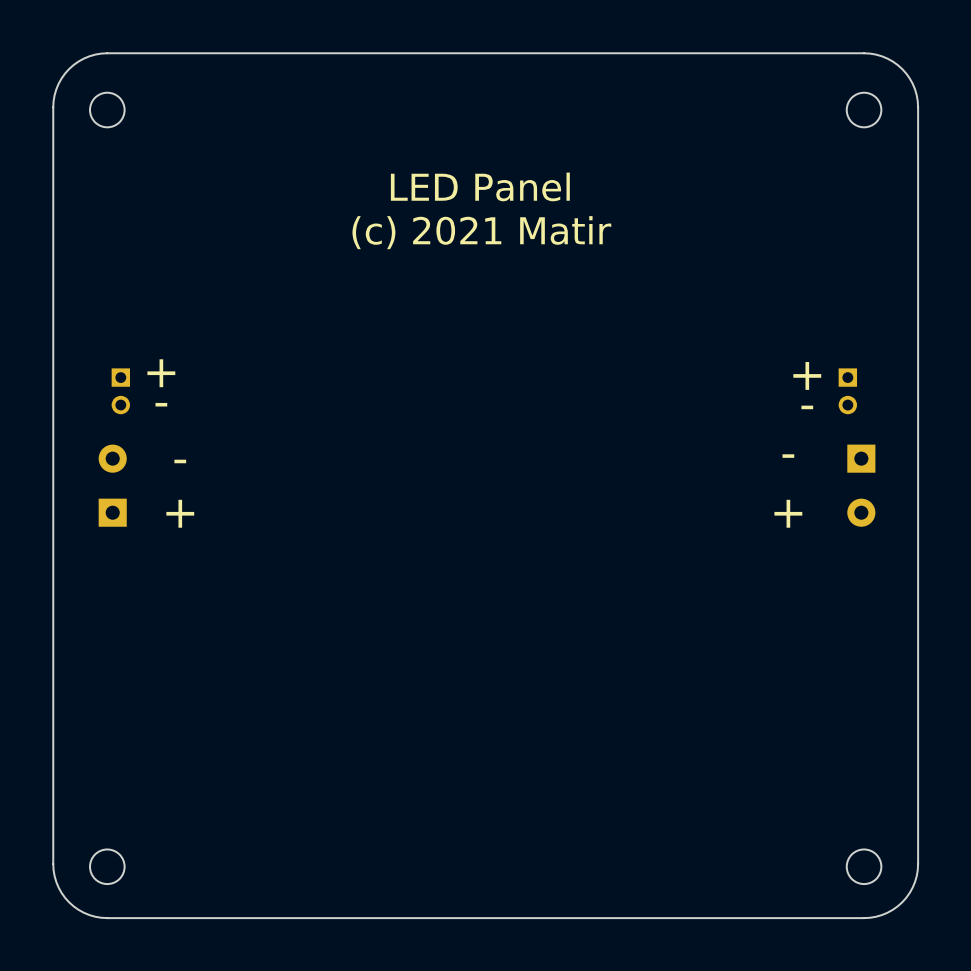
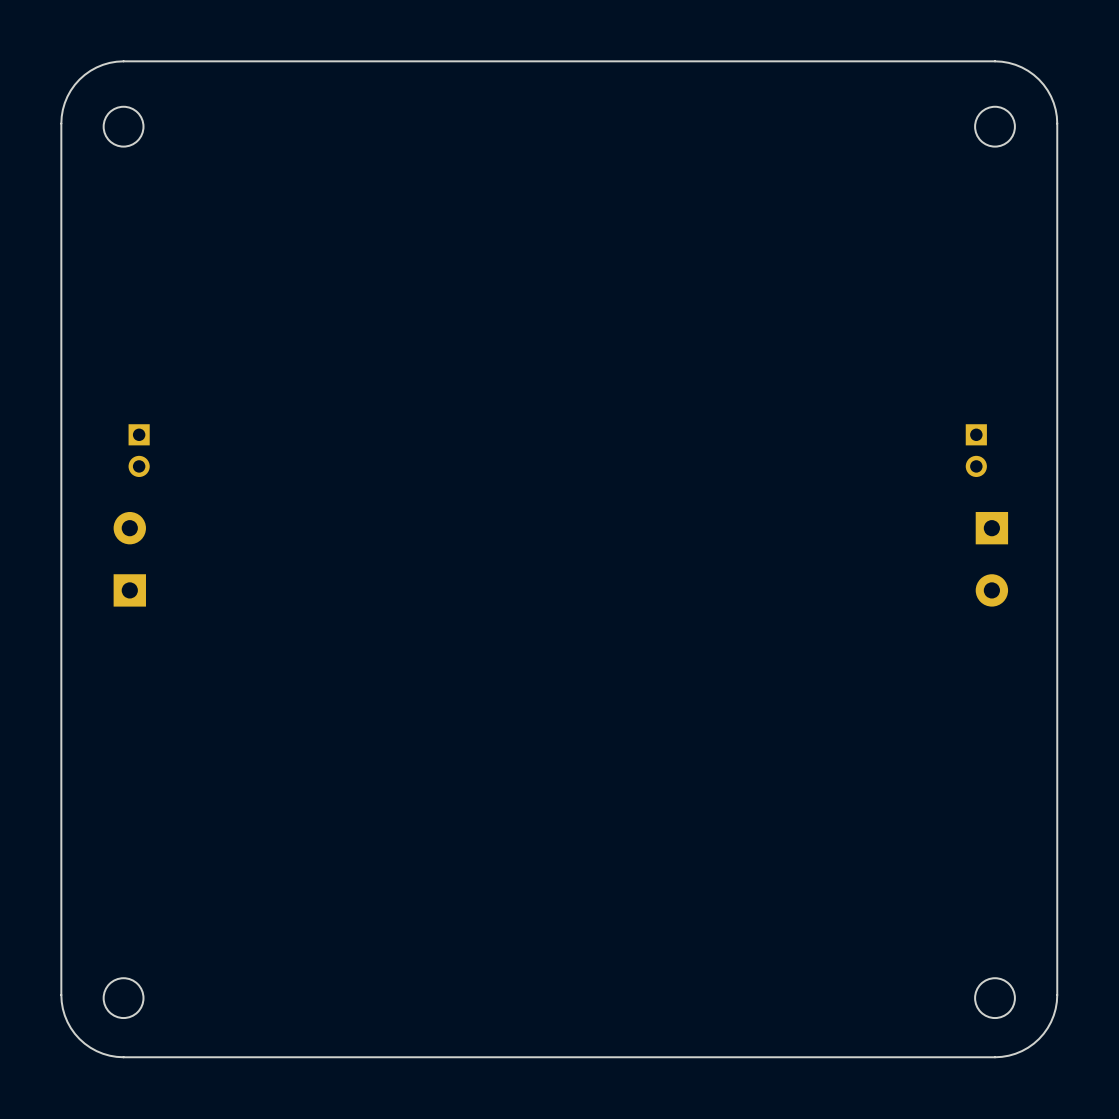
text: LED Panel (480, 186) -> none
text: (c) 2021 Matir (481, 232) -> none
text: + (161, 373) -> none
text: + (807, 375) -> none
text: - (161, 404) -> none
text: - (807, 407) -> none
text: - (788, 456) -> none
text: - (180, 461) -> none
text: + (180, 513) -> none
text: + (788, 513) -> none

